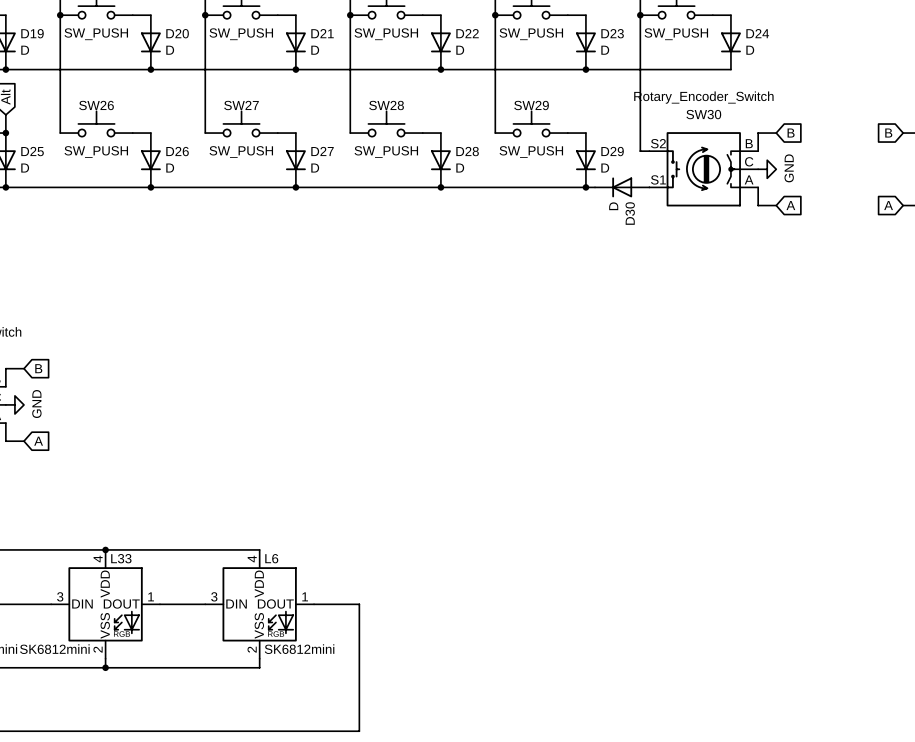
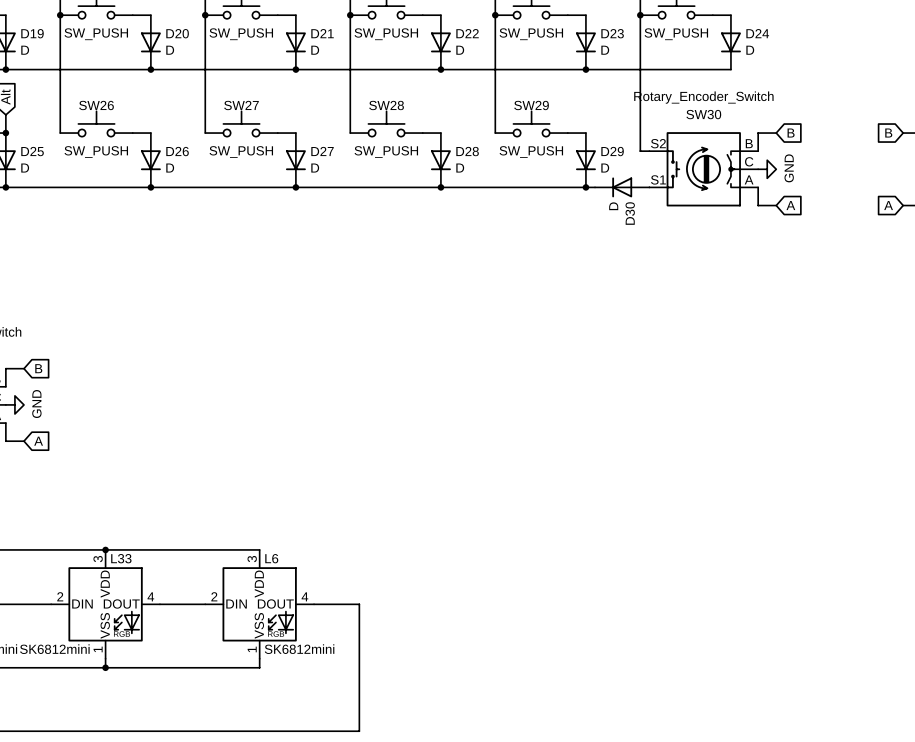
L33 pin number: 4 (98, 559) -> 3 (98, 559)
L6 pin number: 4 (252, 559) -> 3 (252, 559)
L33 pin number: 3 (60, 596) -> 2 (60, 596)
L33 pin number: 1 (151, 596) -> 4 (150, 596)
L6 pin number: 3 (214, 596) -> 2 (214, 596)
L6 pin number: 1 (305, 596) -> 4 (304, 596)
L33 pin number: 2 (98, 649) -> 1 (98, 649)
L6 pin number: 2 (252, 649) -> 1 (252, 649)

